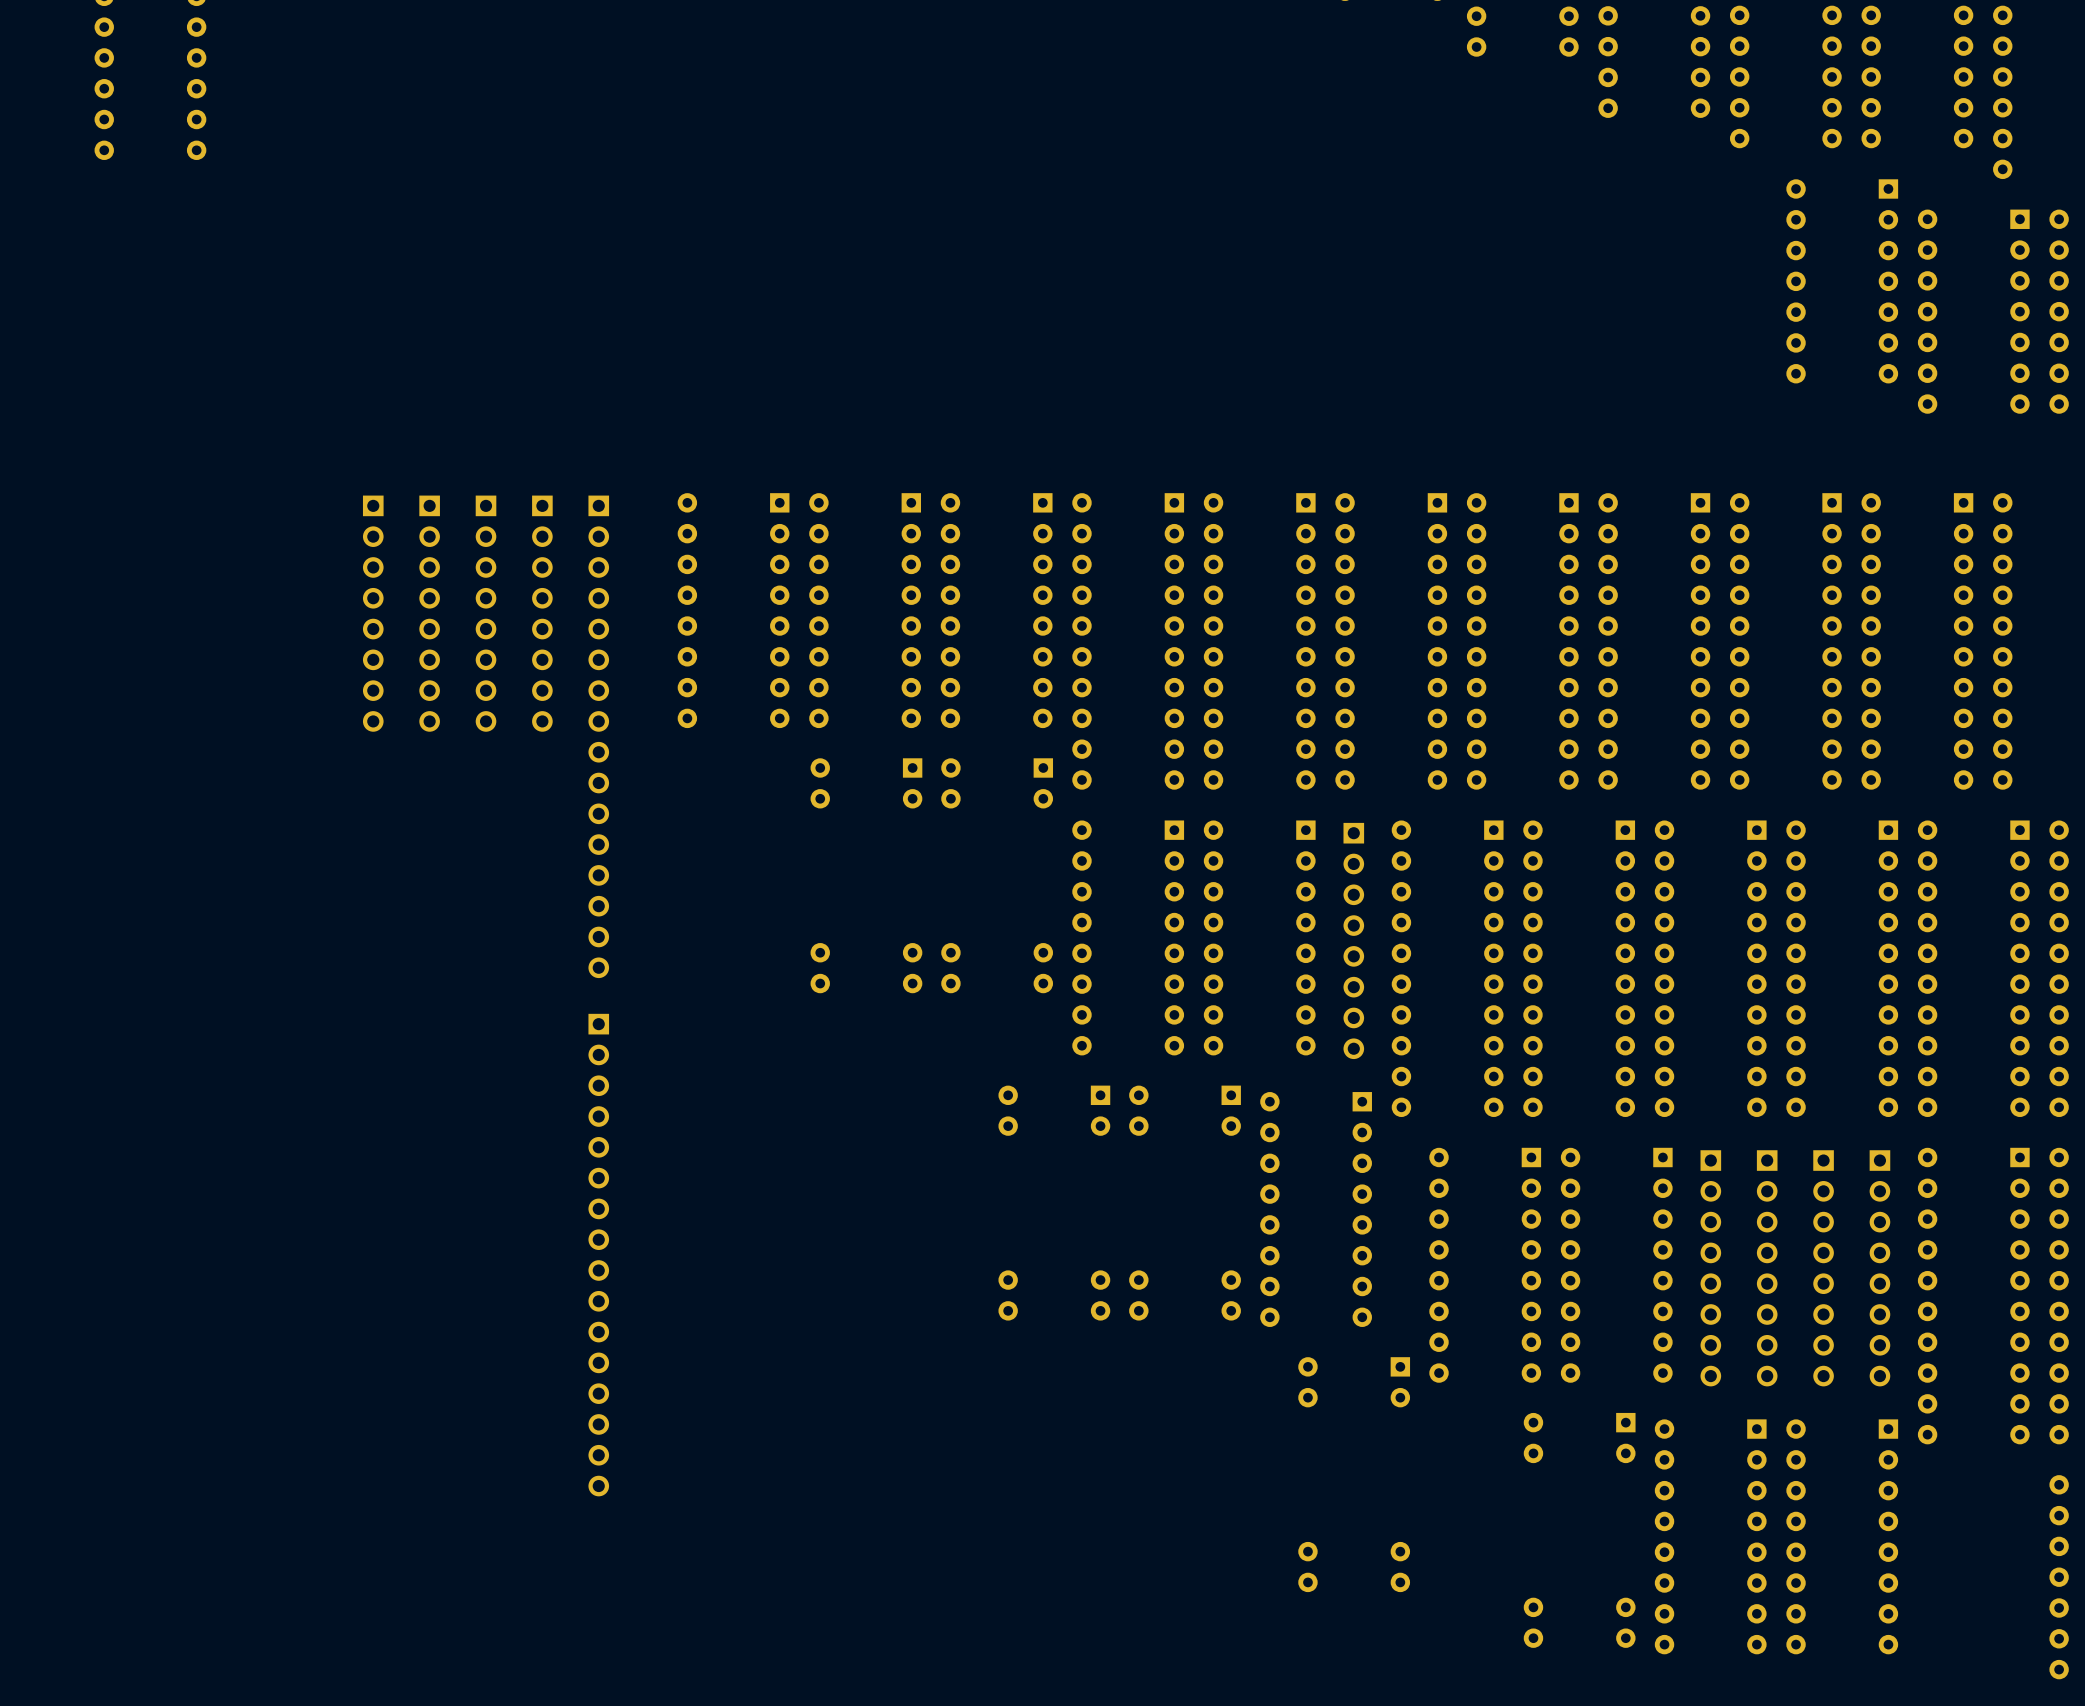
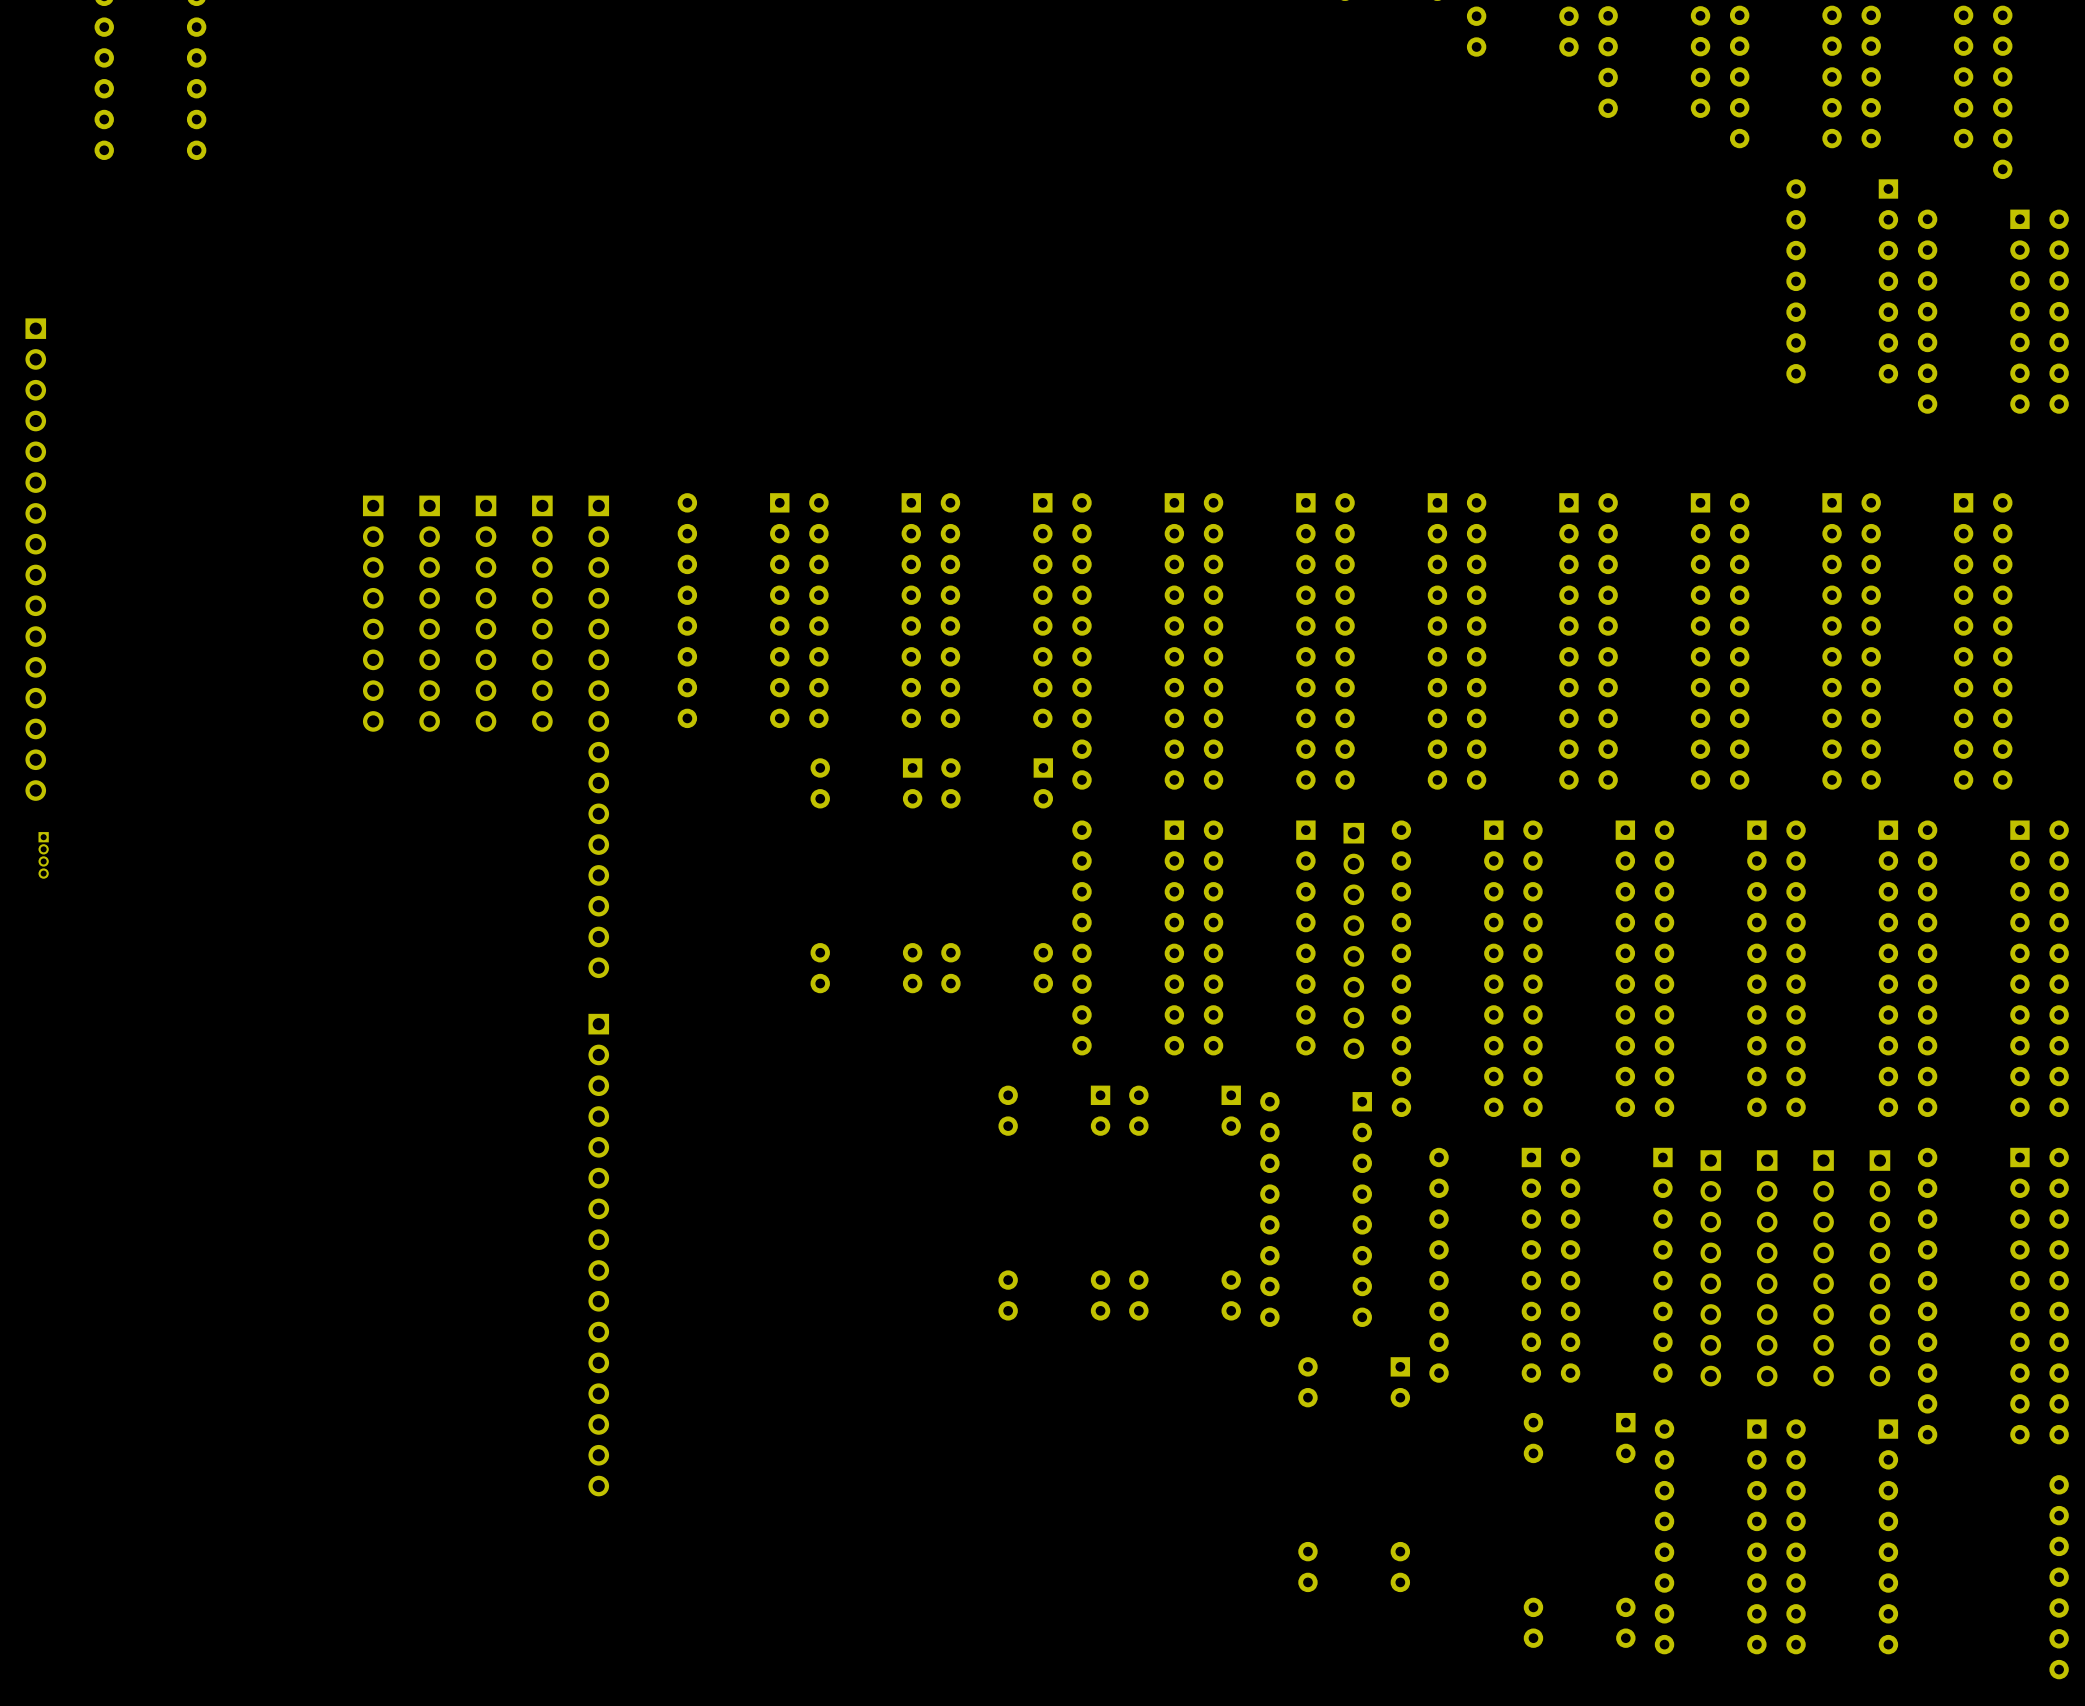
part: none -> (35, 559)
part: none -> (43, 855)

